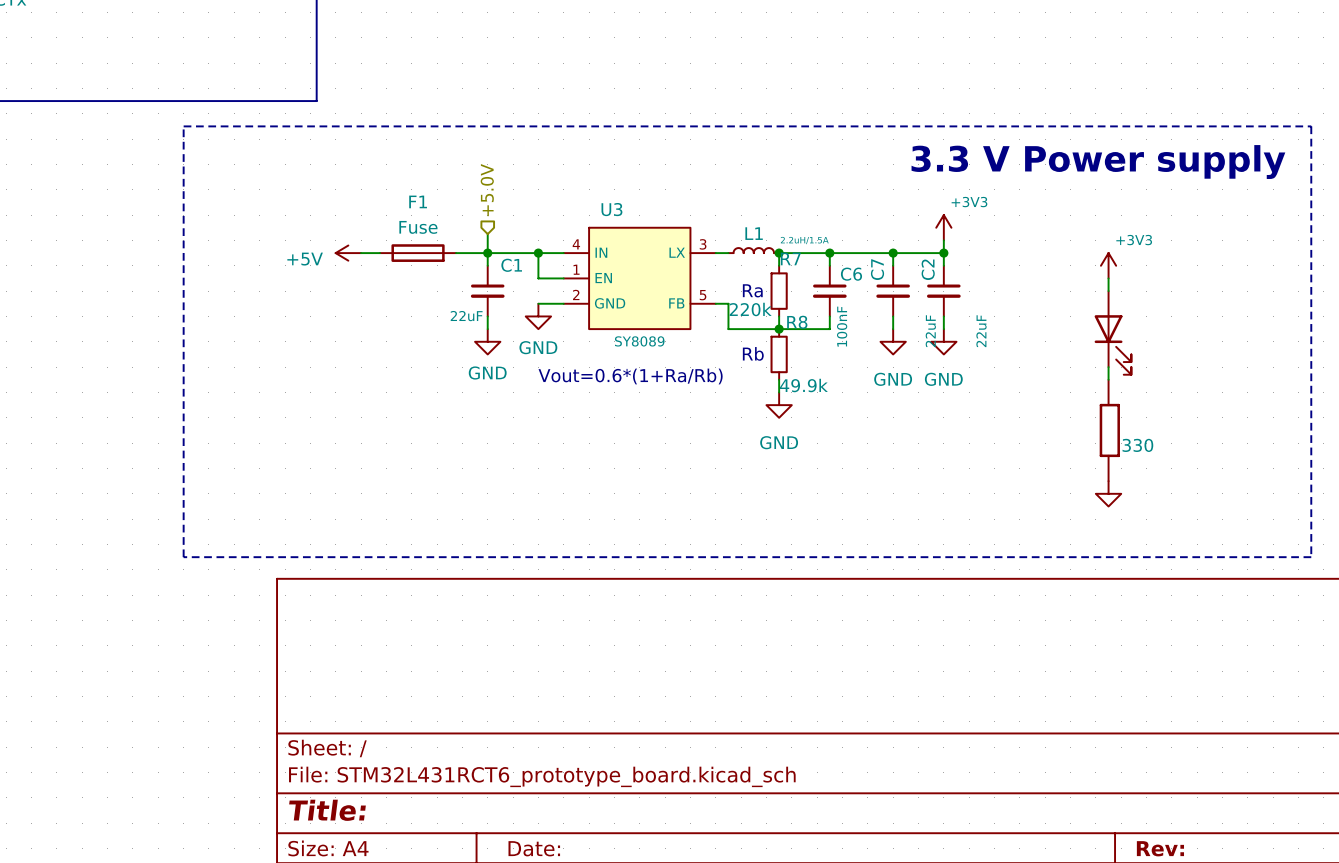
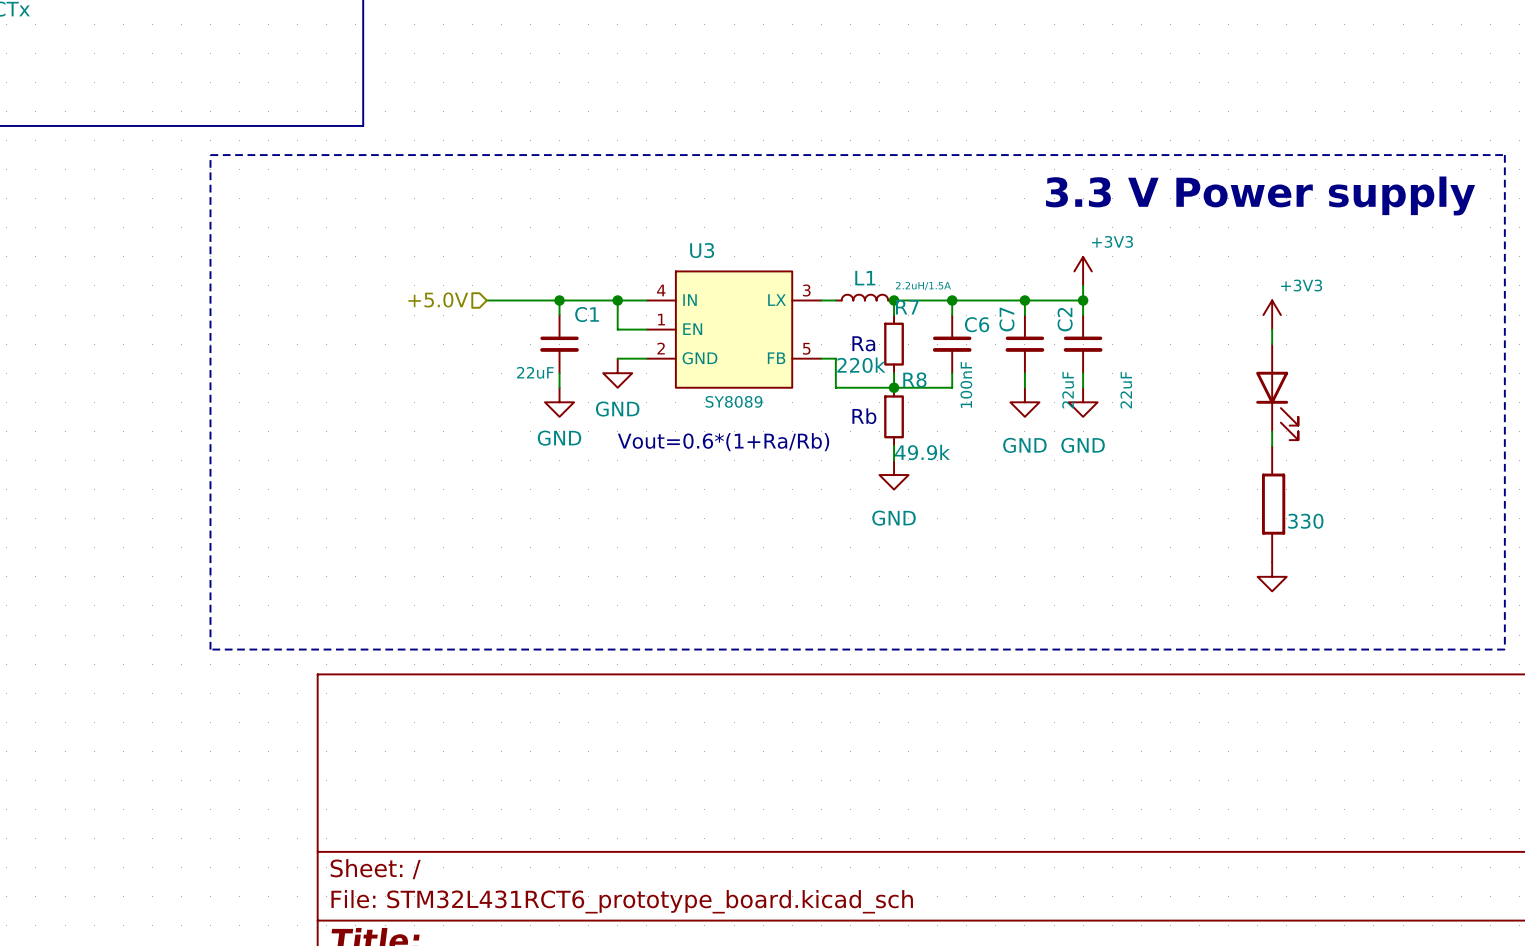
hierarchical label rotation: 0° (487, 190) -> 90° counterclockwise (438, 299)
hierarchical label position: +5.0V (487, 190) -> +5.0V (438, 299)
wire: (487, 234) (487, 253) -> none
power symbol: +5V (348, 253) -> none
wire: (361, 253) (380, 253) -> none
F1: Fuse (418, 253) -> none

